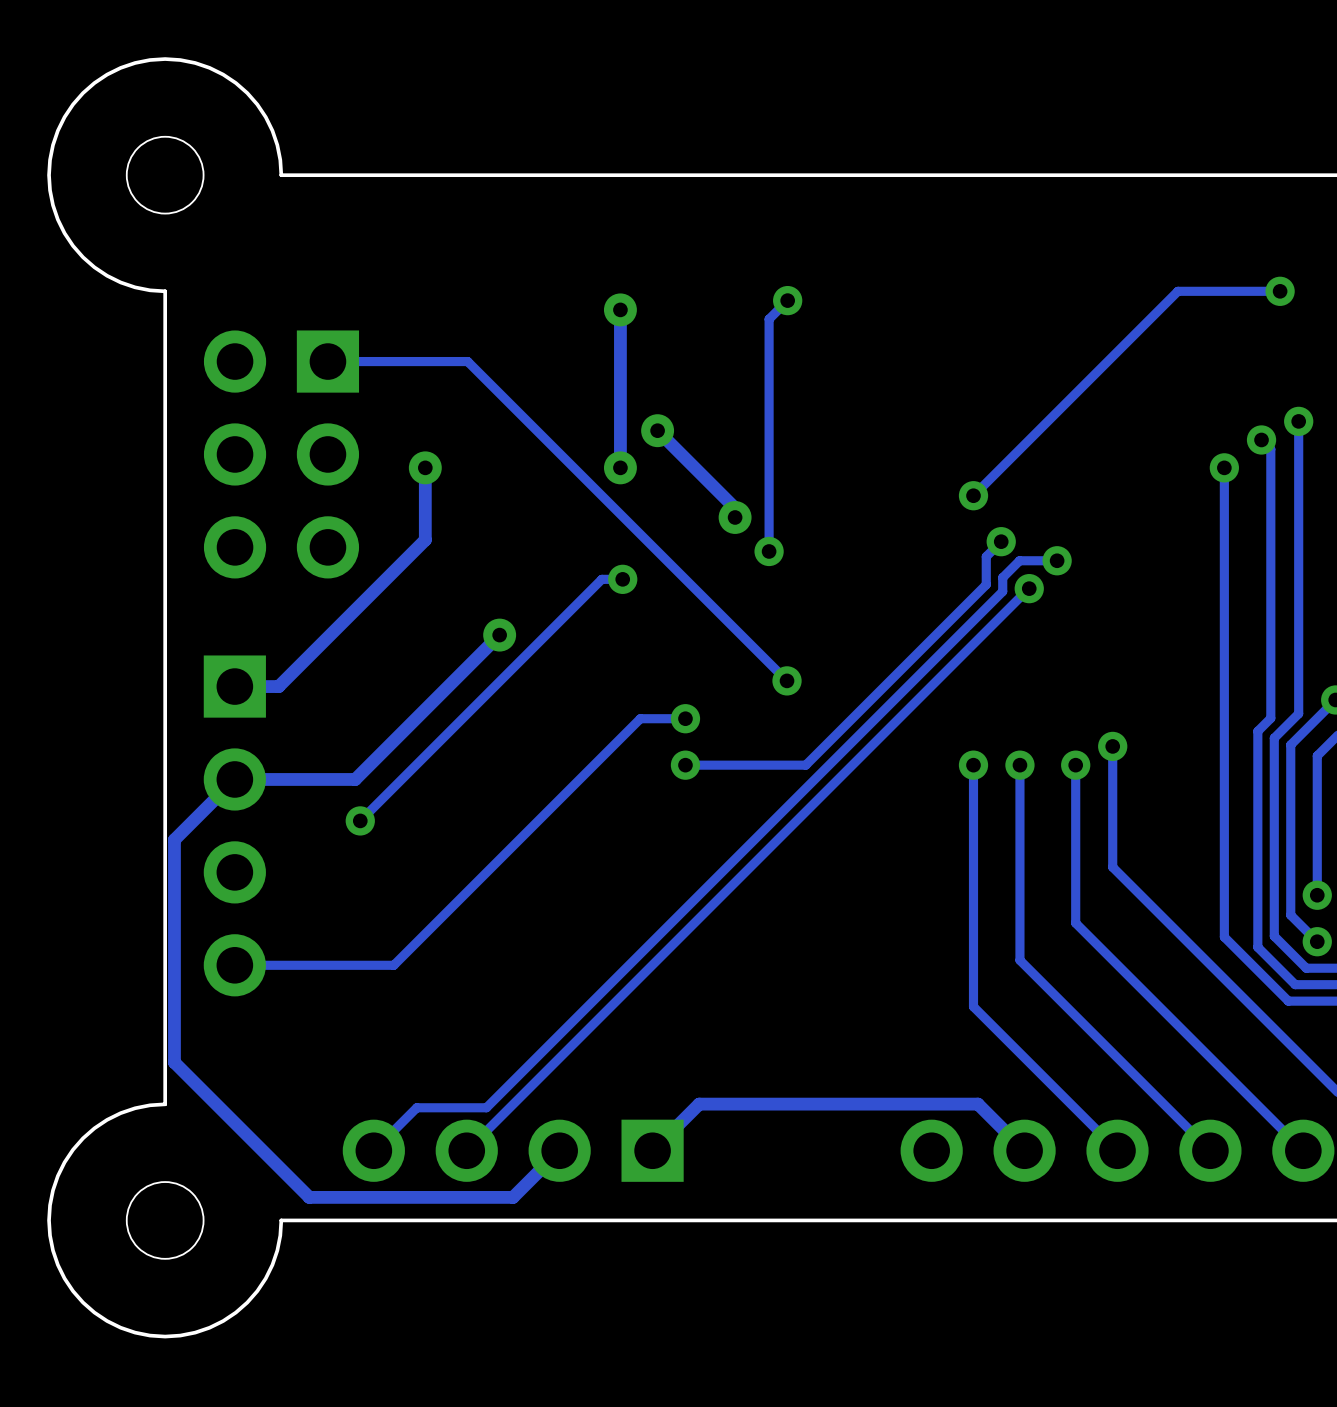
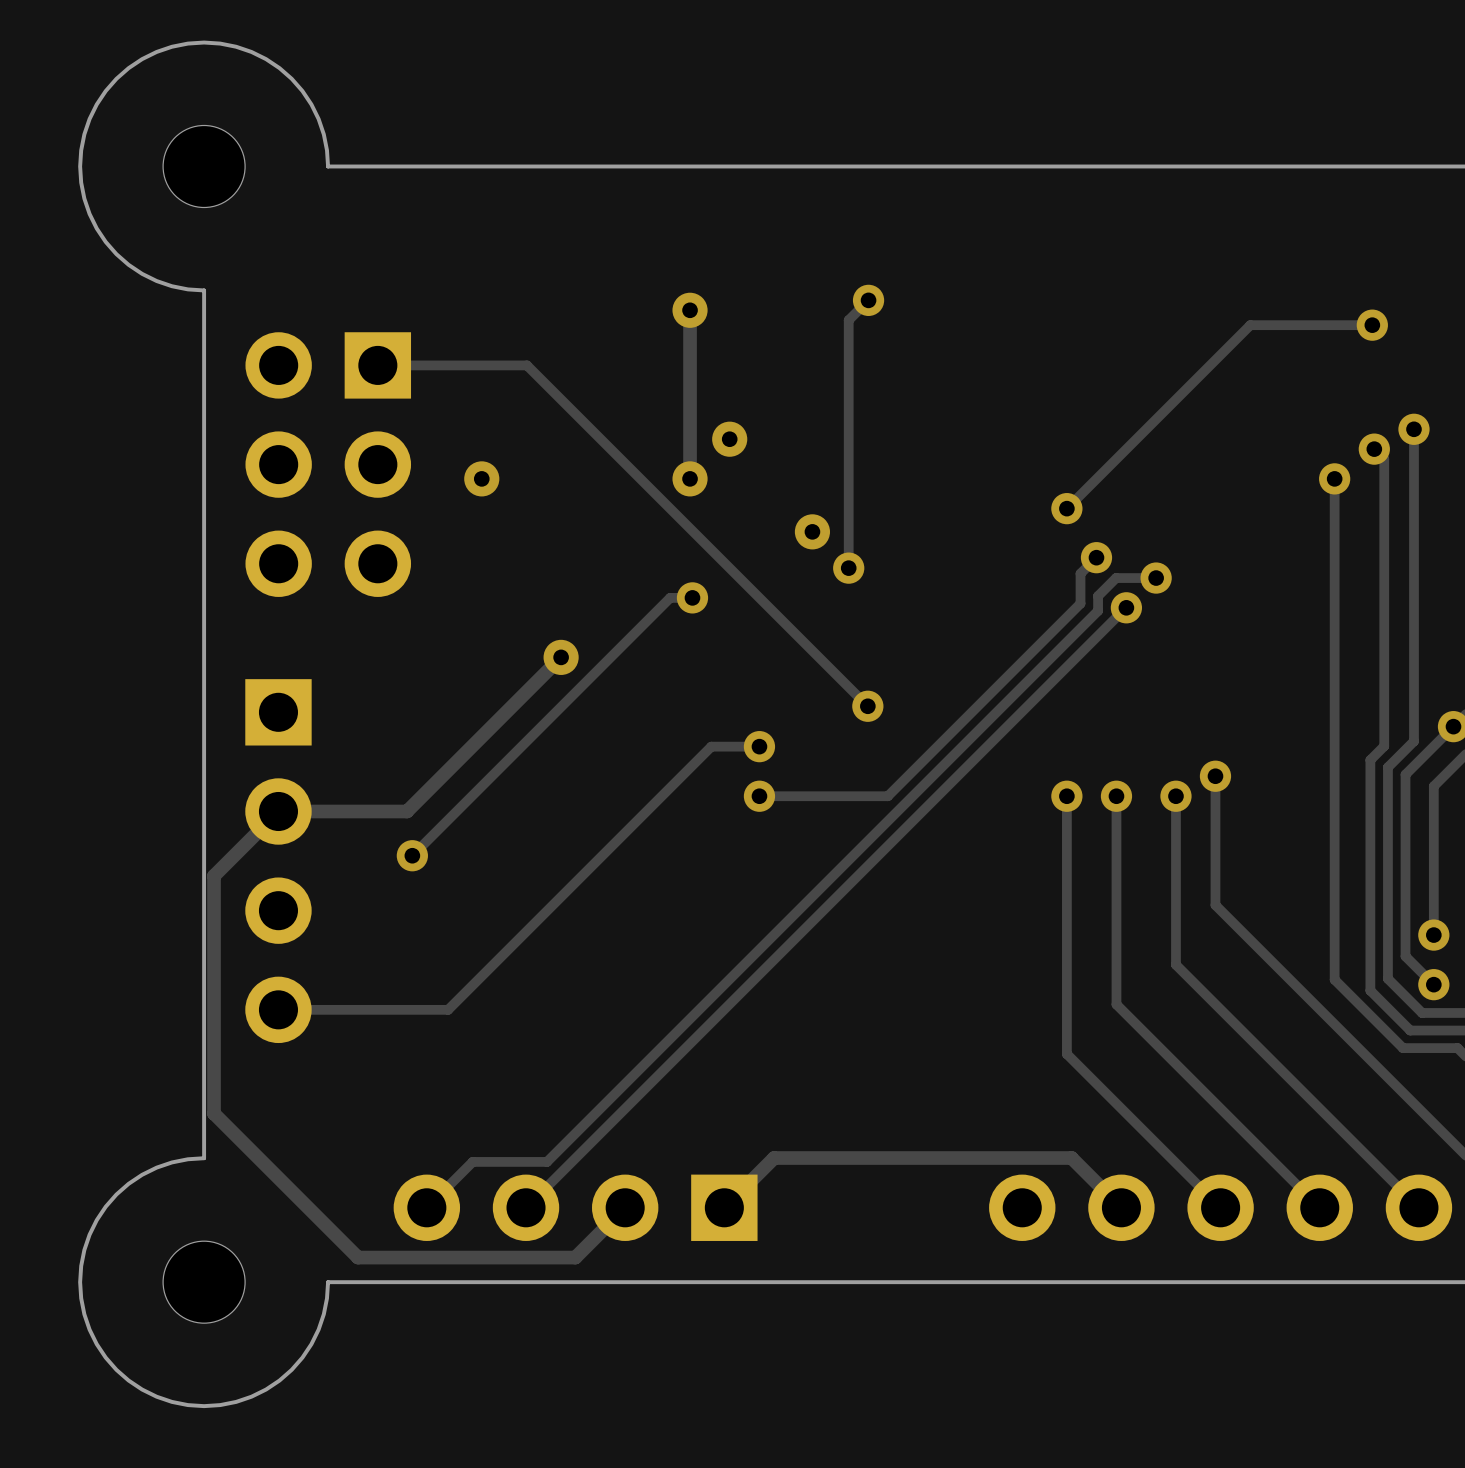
track: (1280, 291) (1177, 291) (1145, 323) -> (1372, 325) (1250, 325)
via position: (1280, 291) -> (1372, 325)
track: (657, 430) (735, 508) -> none
track: (425, 467) (425, 539) (278, 686) (234, 686) -> none

